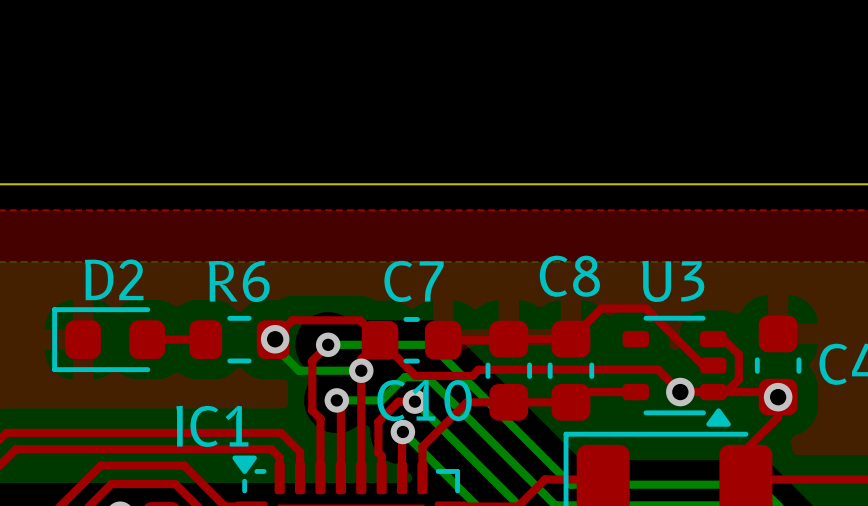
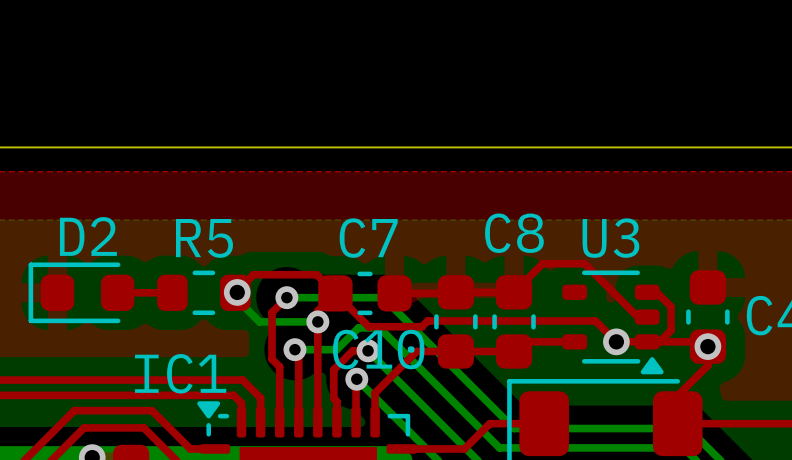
R6 name: R6 (239, 281) -> R5 (204, 238)

